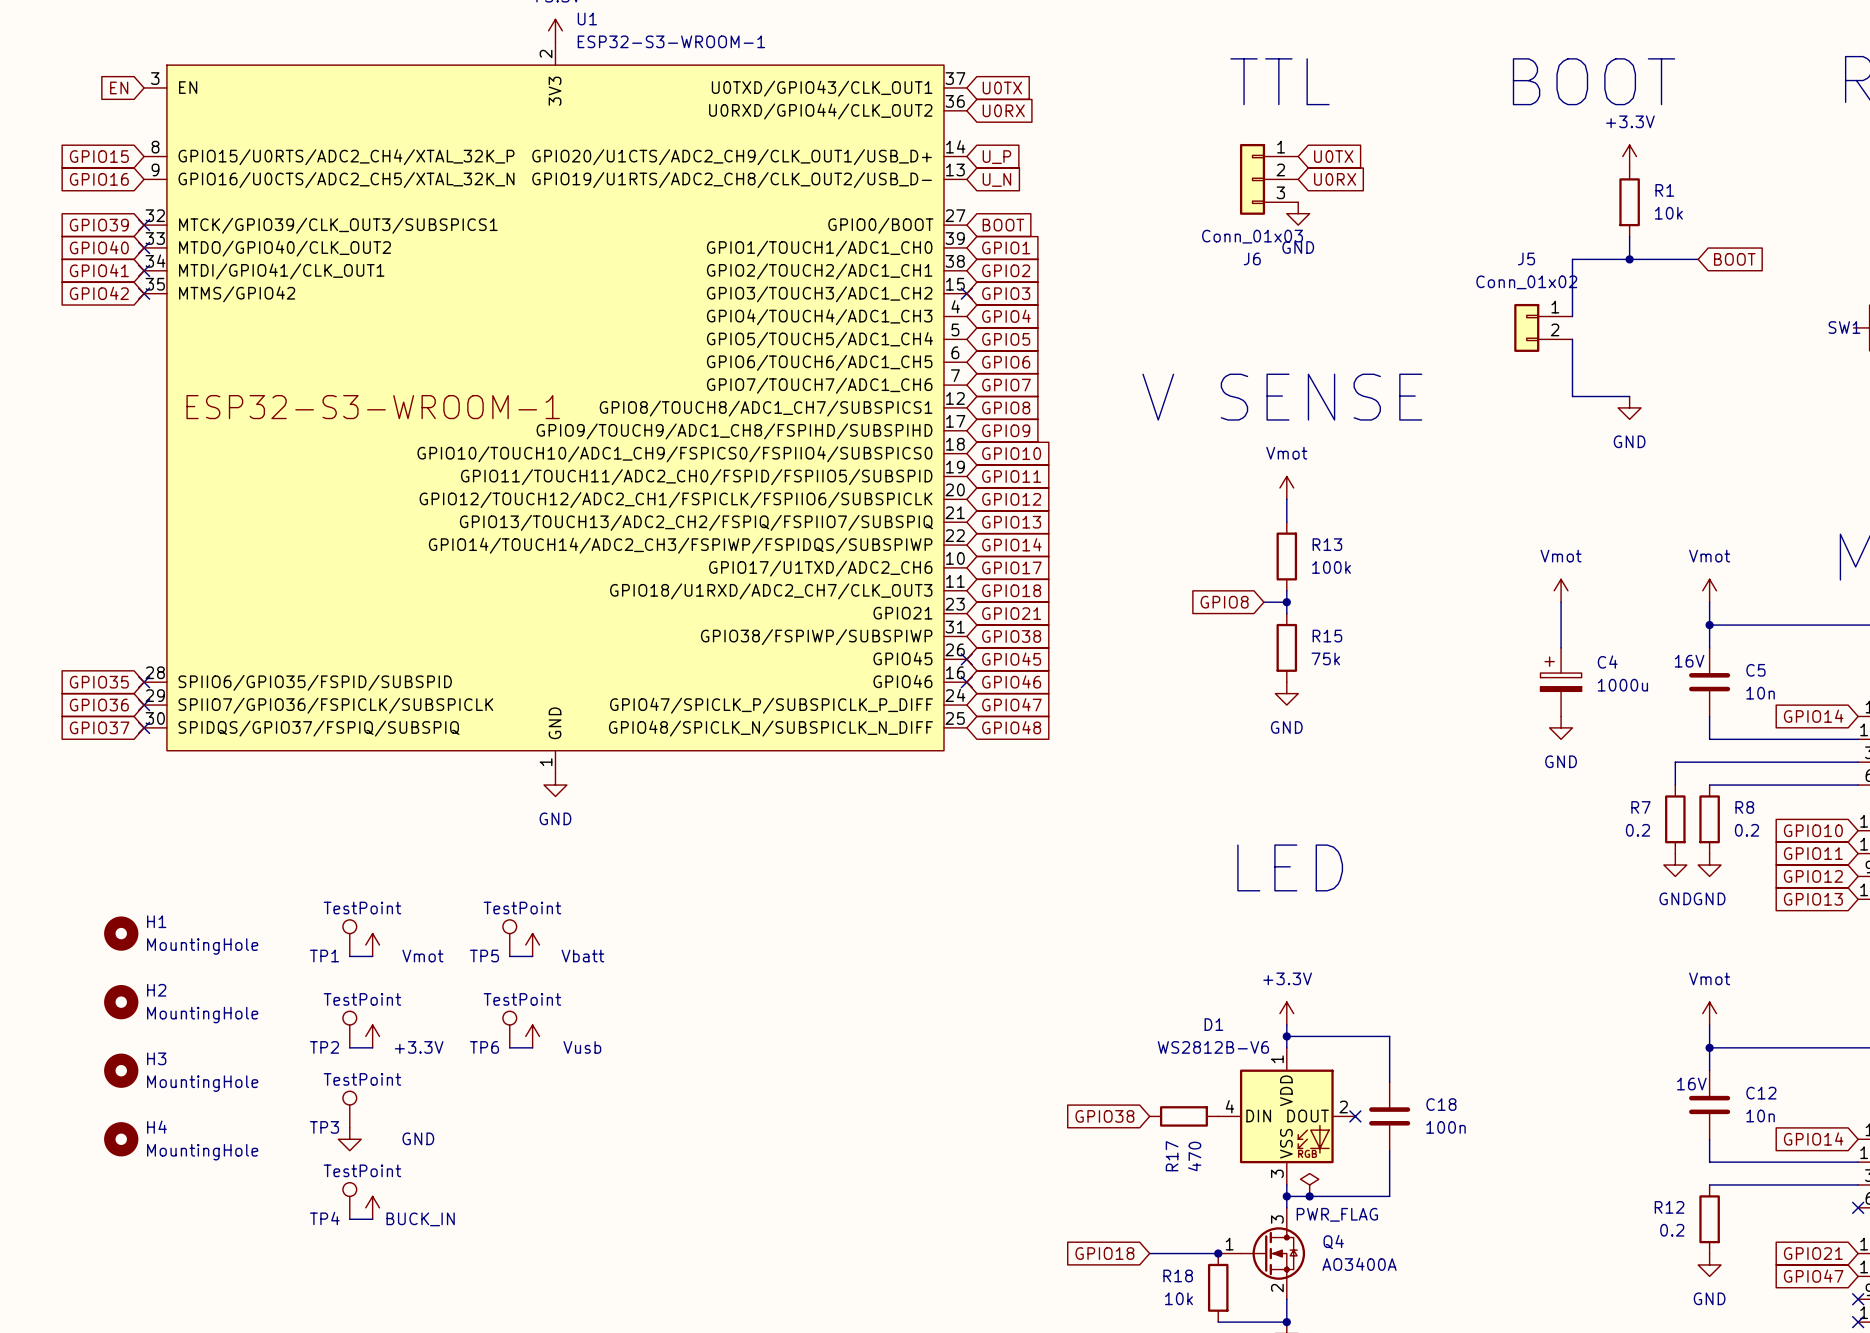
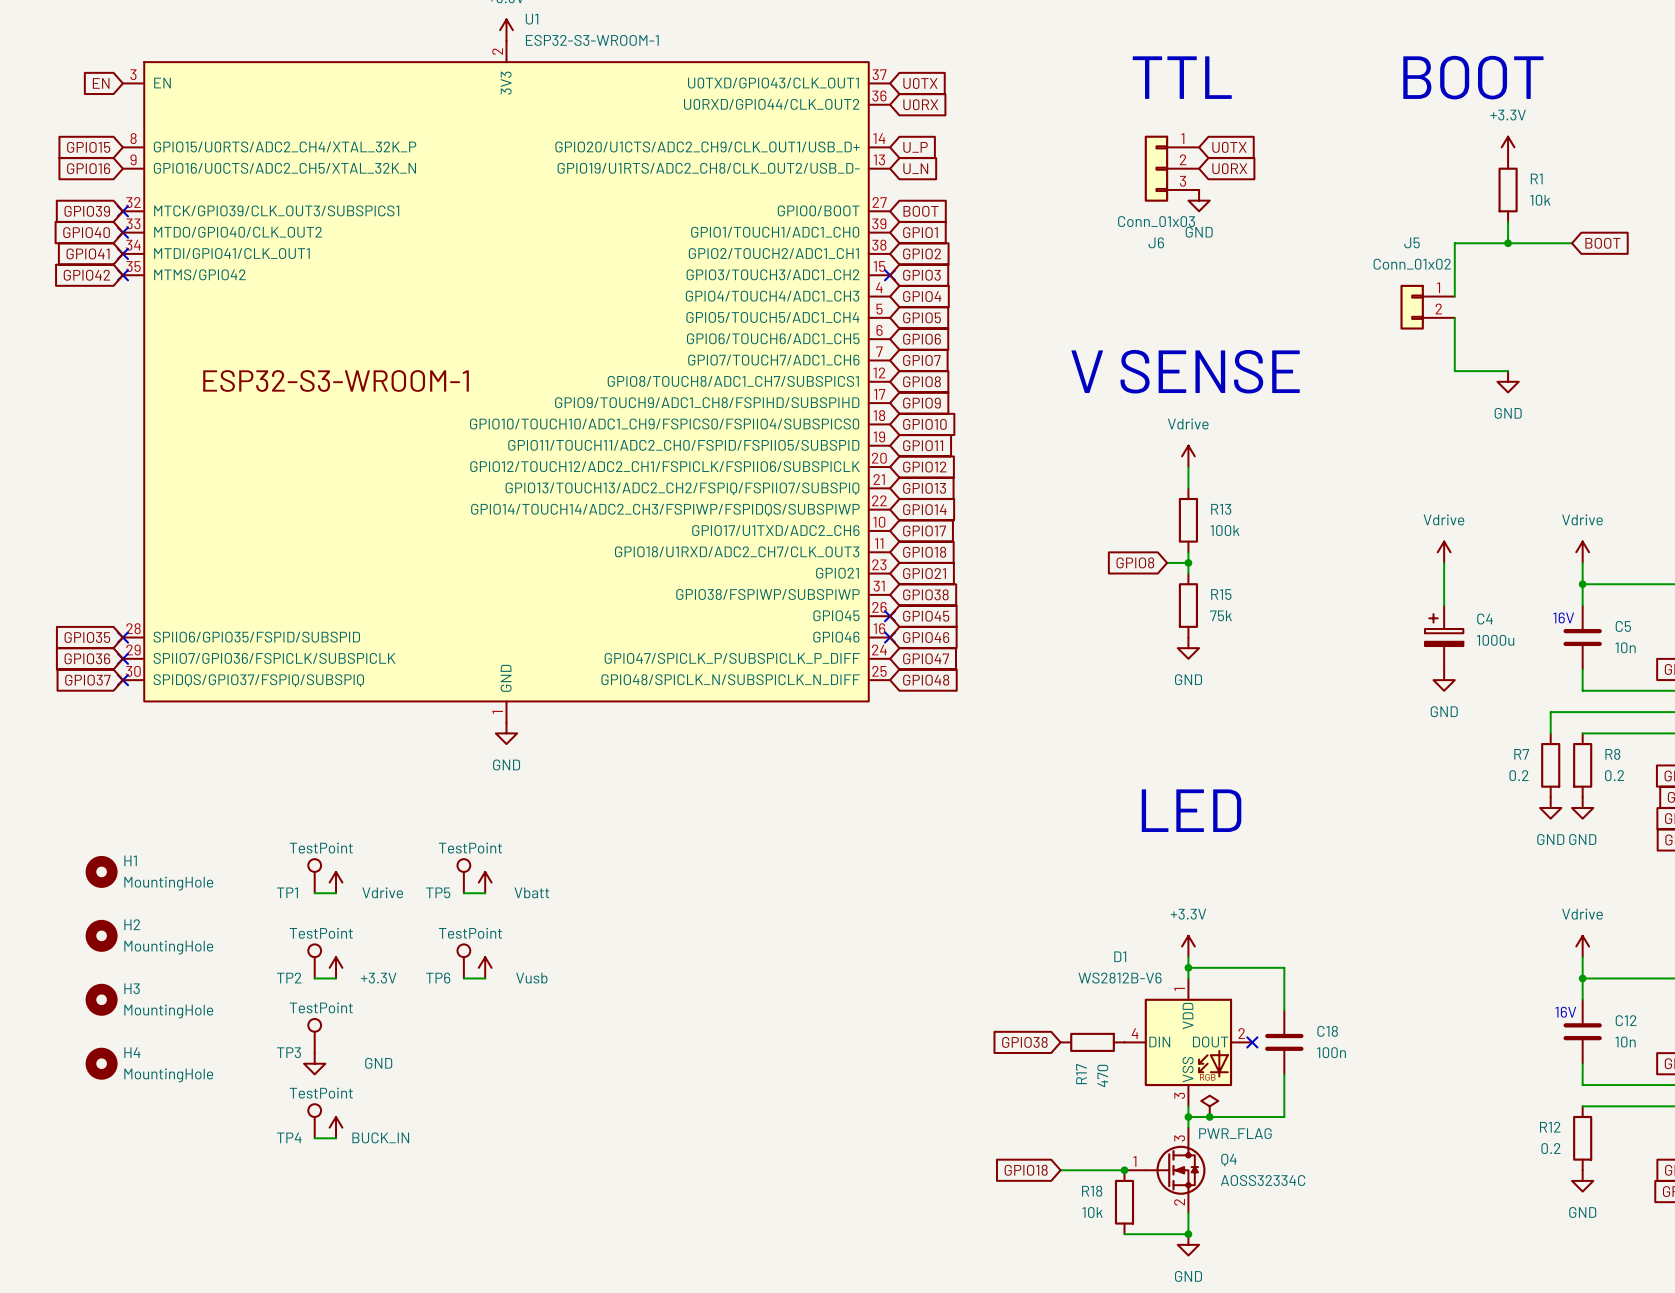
power symbol: Vmot (1286, 487) -> Vdrive (1188, 456)
power symbol: Vmot (1561, 590) -> Vdrive (1444, 552)
power symbol: Vmot (1709, 590) -> Vdrive (1582, 552)
power symbol: Vmot (372, 945) -> Vdrive (336, 882)
power symbol: Vmot (1709, 1013) -> Vdrive (1582, 946)
Q4 value: AO3400A (1359, 1264) -> AOSS32334C (1263, 1180)

